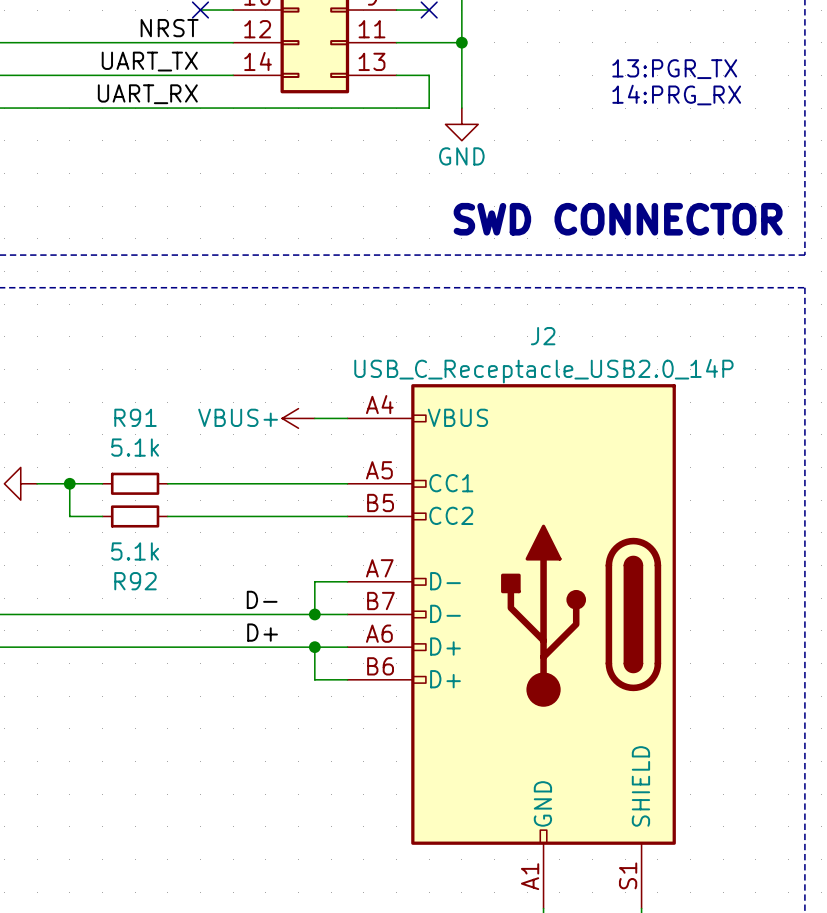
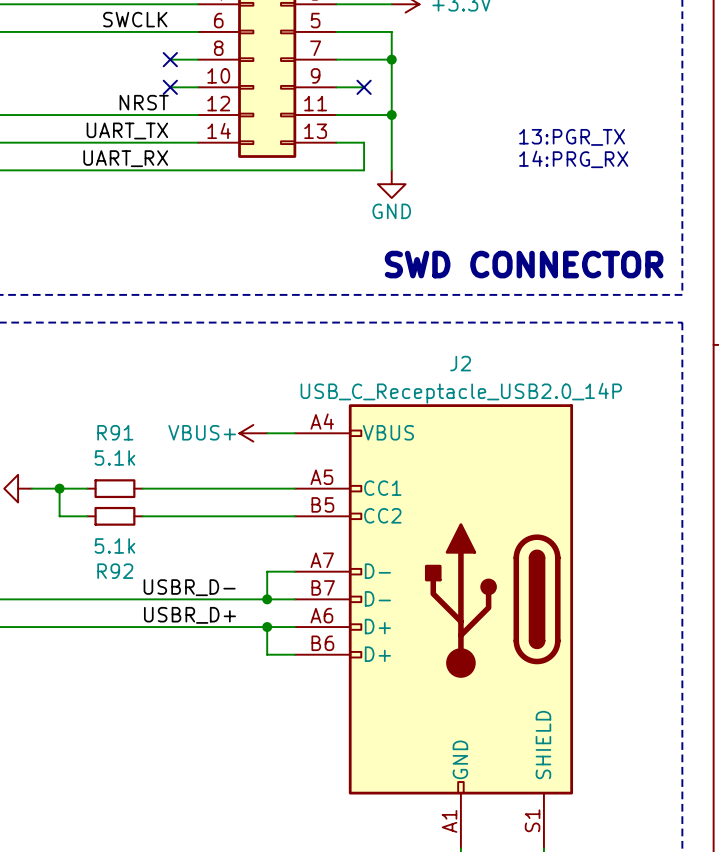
label: D- (262, 599) -> USBR_D- (189, 587)
label: D+ (262, 632) -> USBR_D+ (189, 615)

